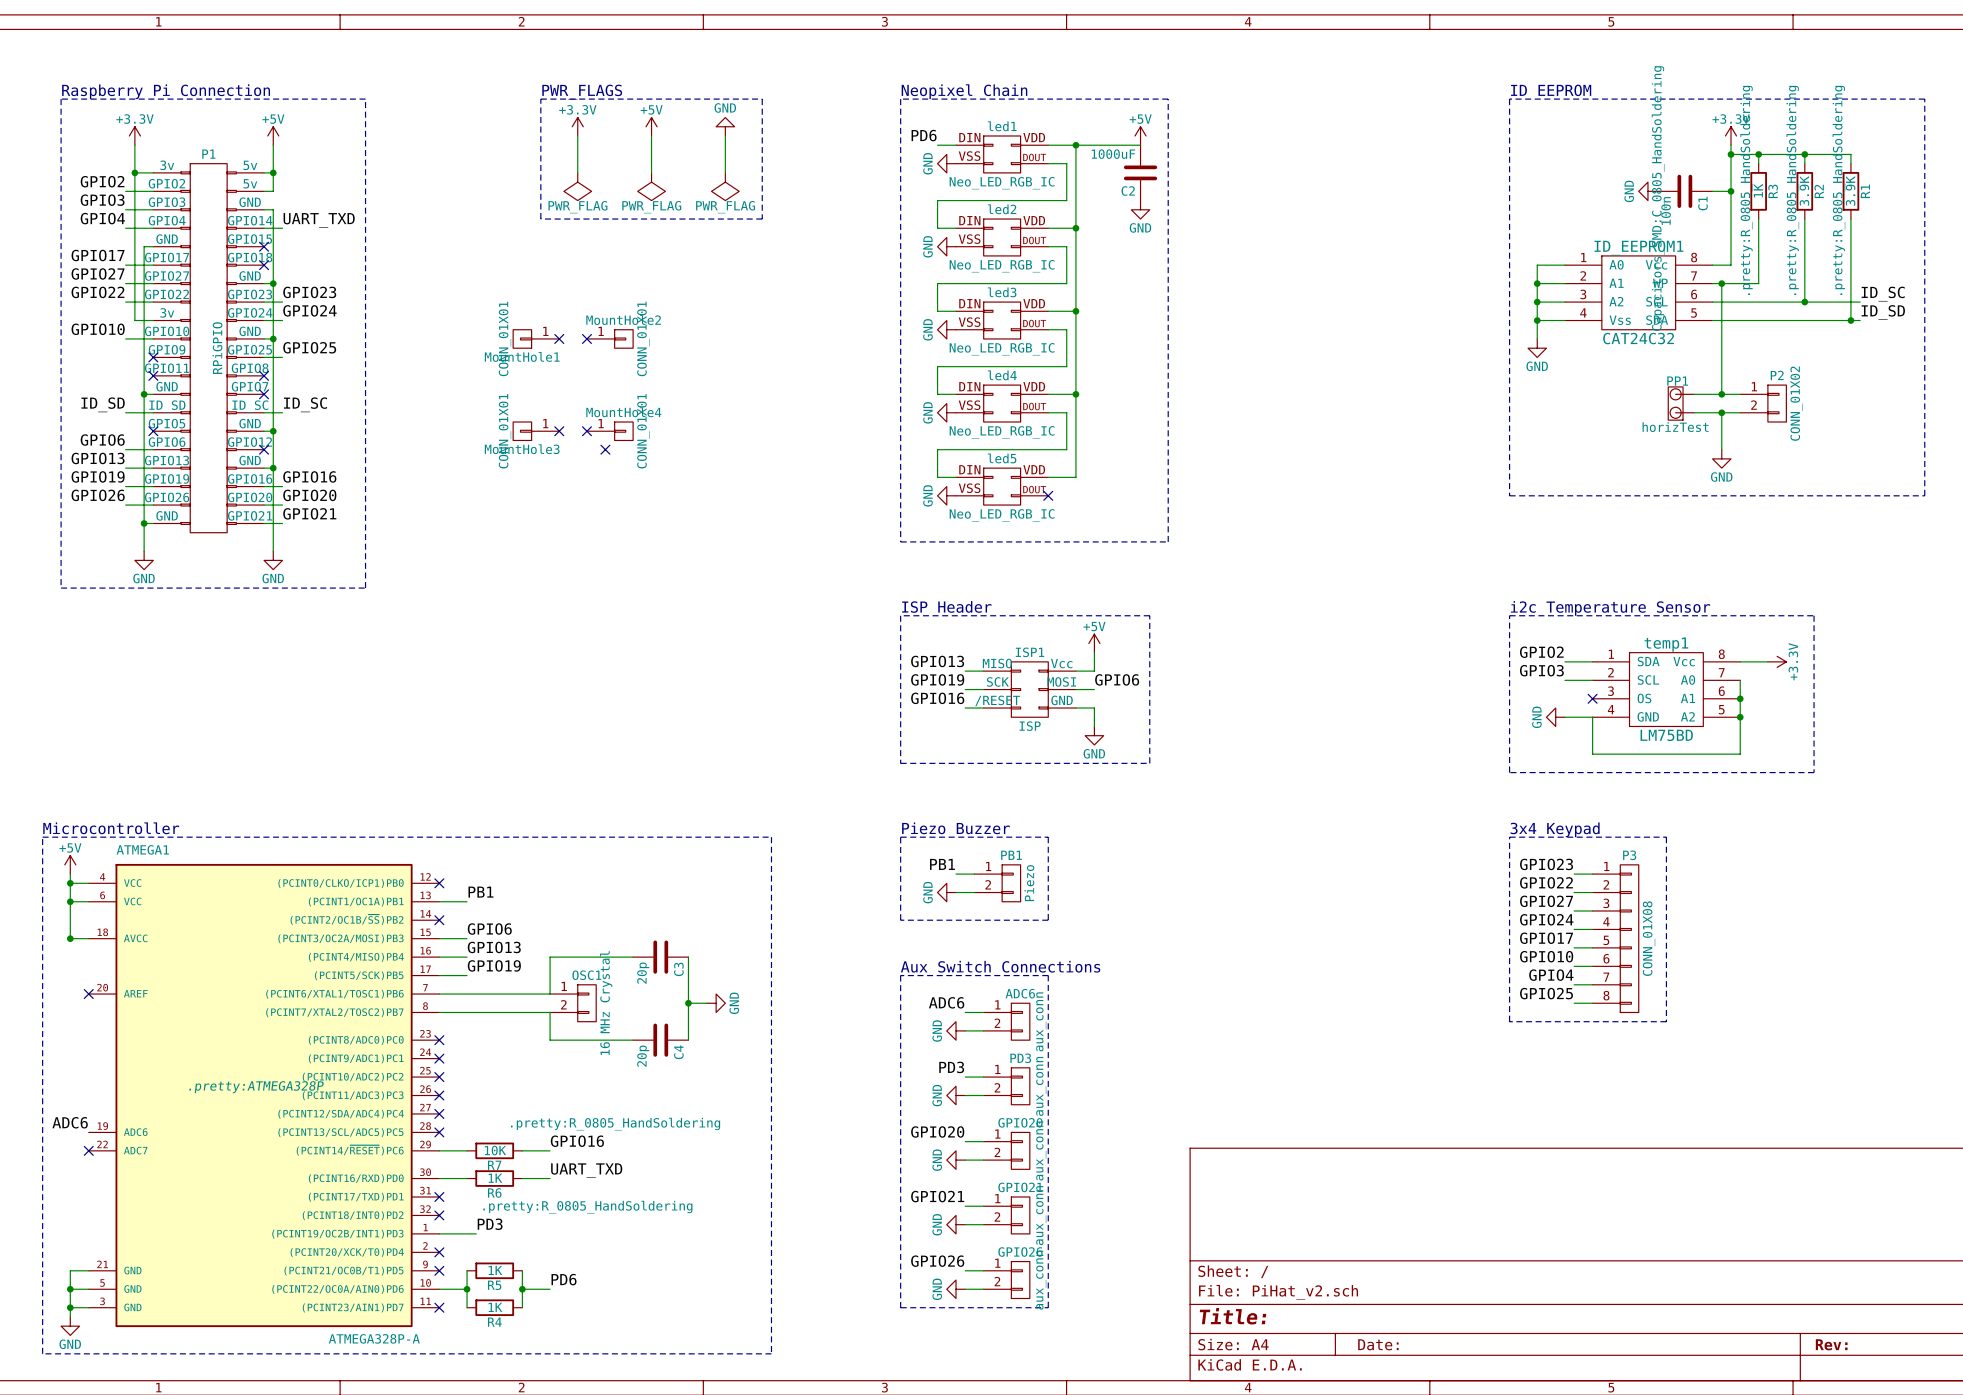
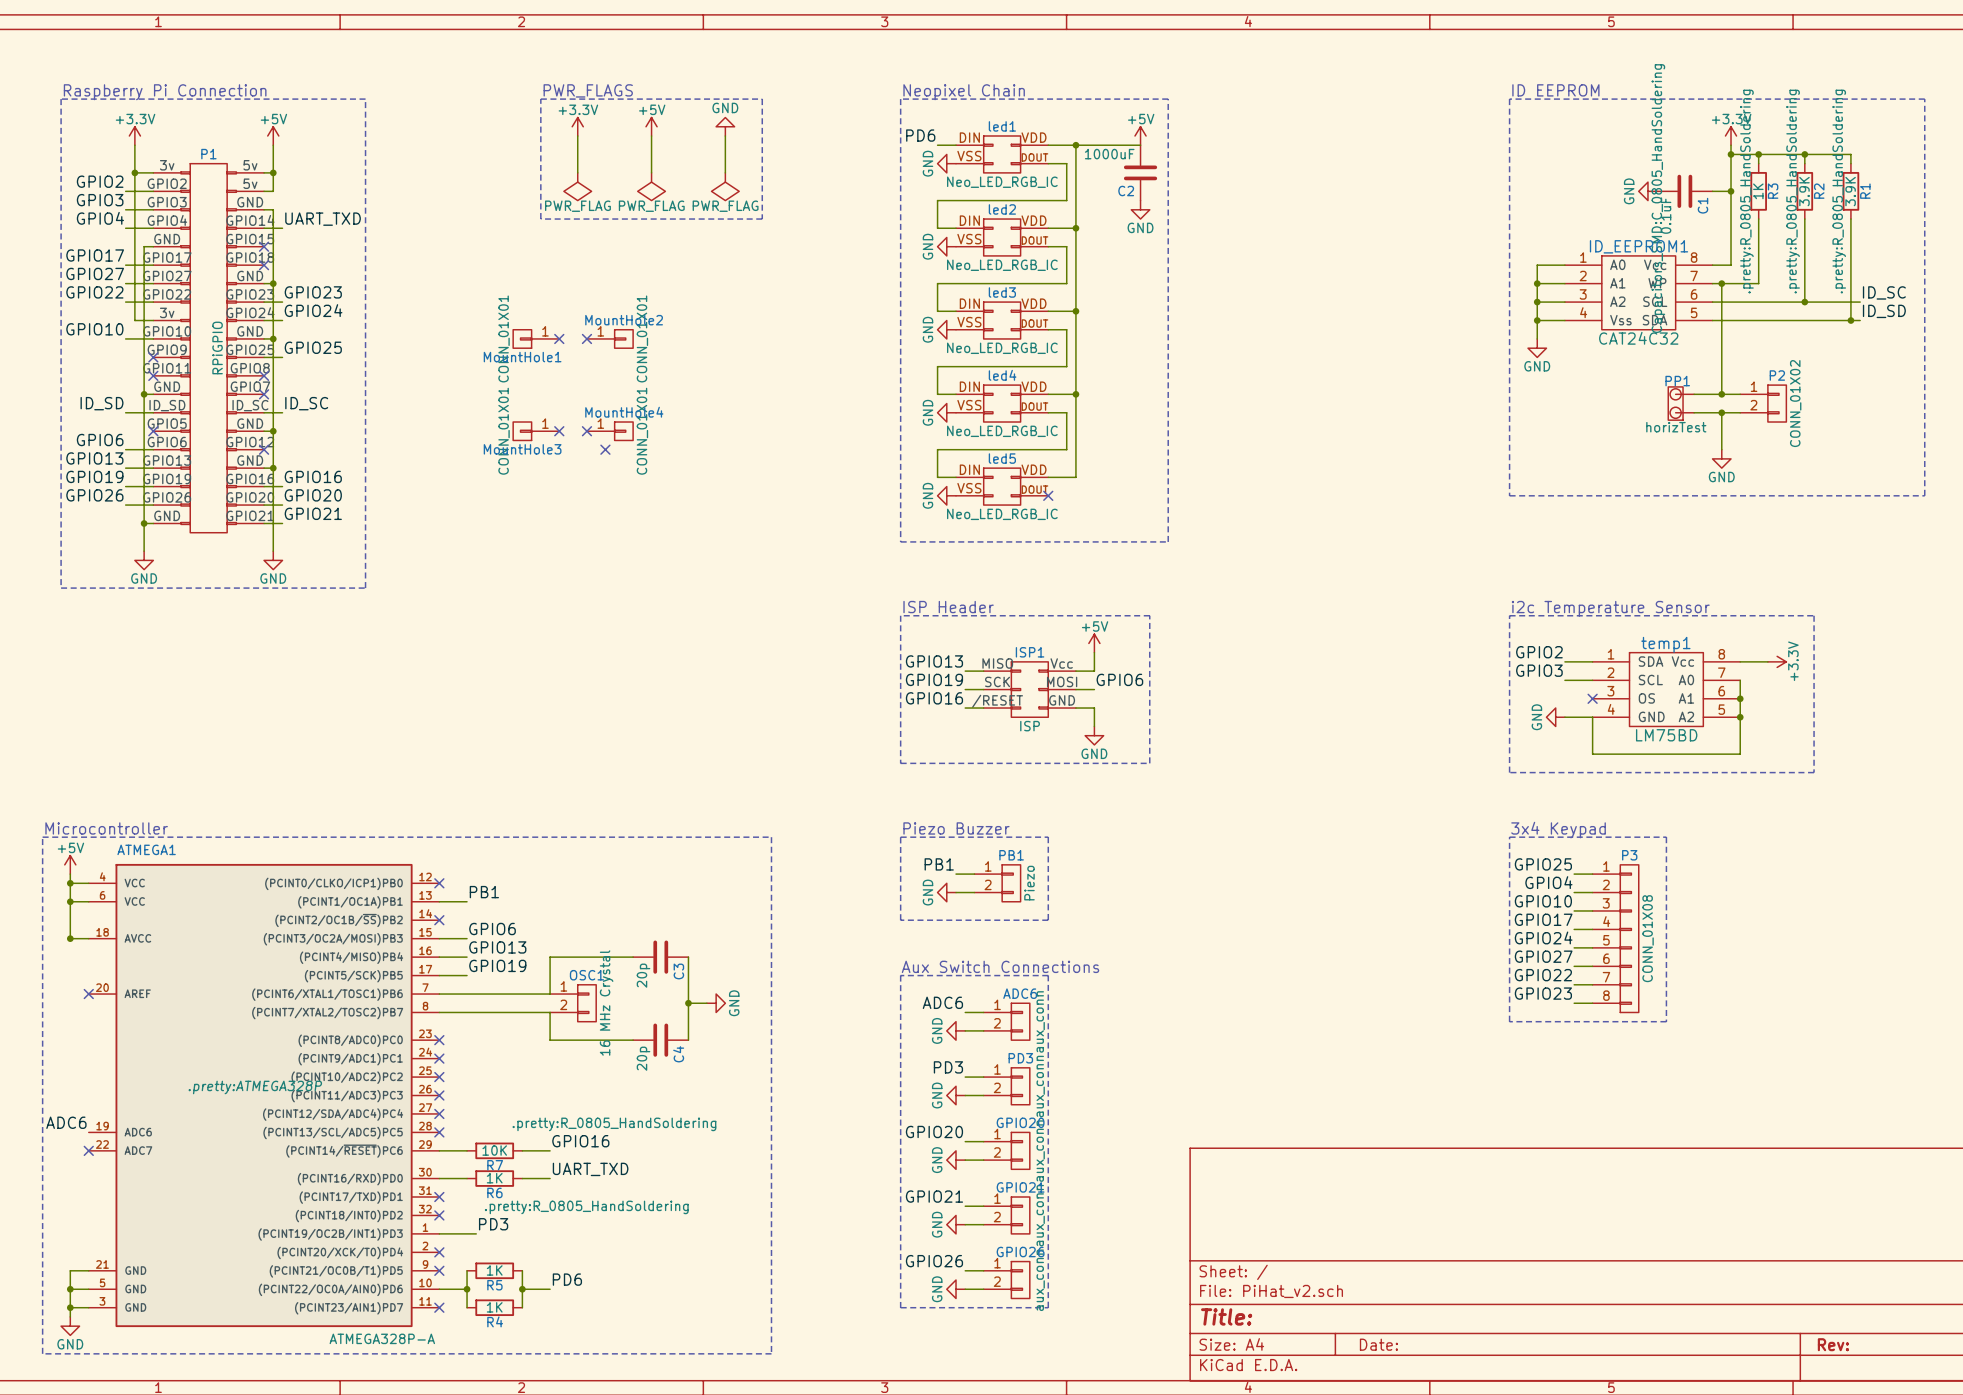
C1 value: 100n (1666, 211) -> 0.1uF (1666, 215)
label: GPIO23 (1546, 864) -> GPIO25 (1543, 864)
label: GPIO22 (1546, 882) -> GPIO4 (1548, 882)
label: GPIO27 (1546, 901) -> GPIO10 (1543, 901)
label: GPIO24 (1546, 919) -> GPIO17 (1543, 919)
label: GPIO17 (1546, 938) -> GPIO24 (1543, 937)
label: GPIO10 (1546, 956) -> GPIO27 (1543, 956)
label: GPIO4 (1551, 975) -> GPIO22 (1543, 975)
label: GPIO25 (1546, 993) -> GPIO23 (1543, 993)

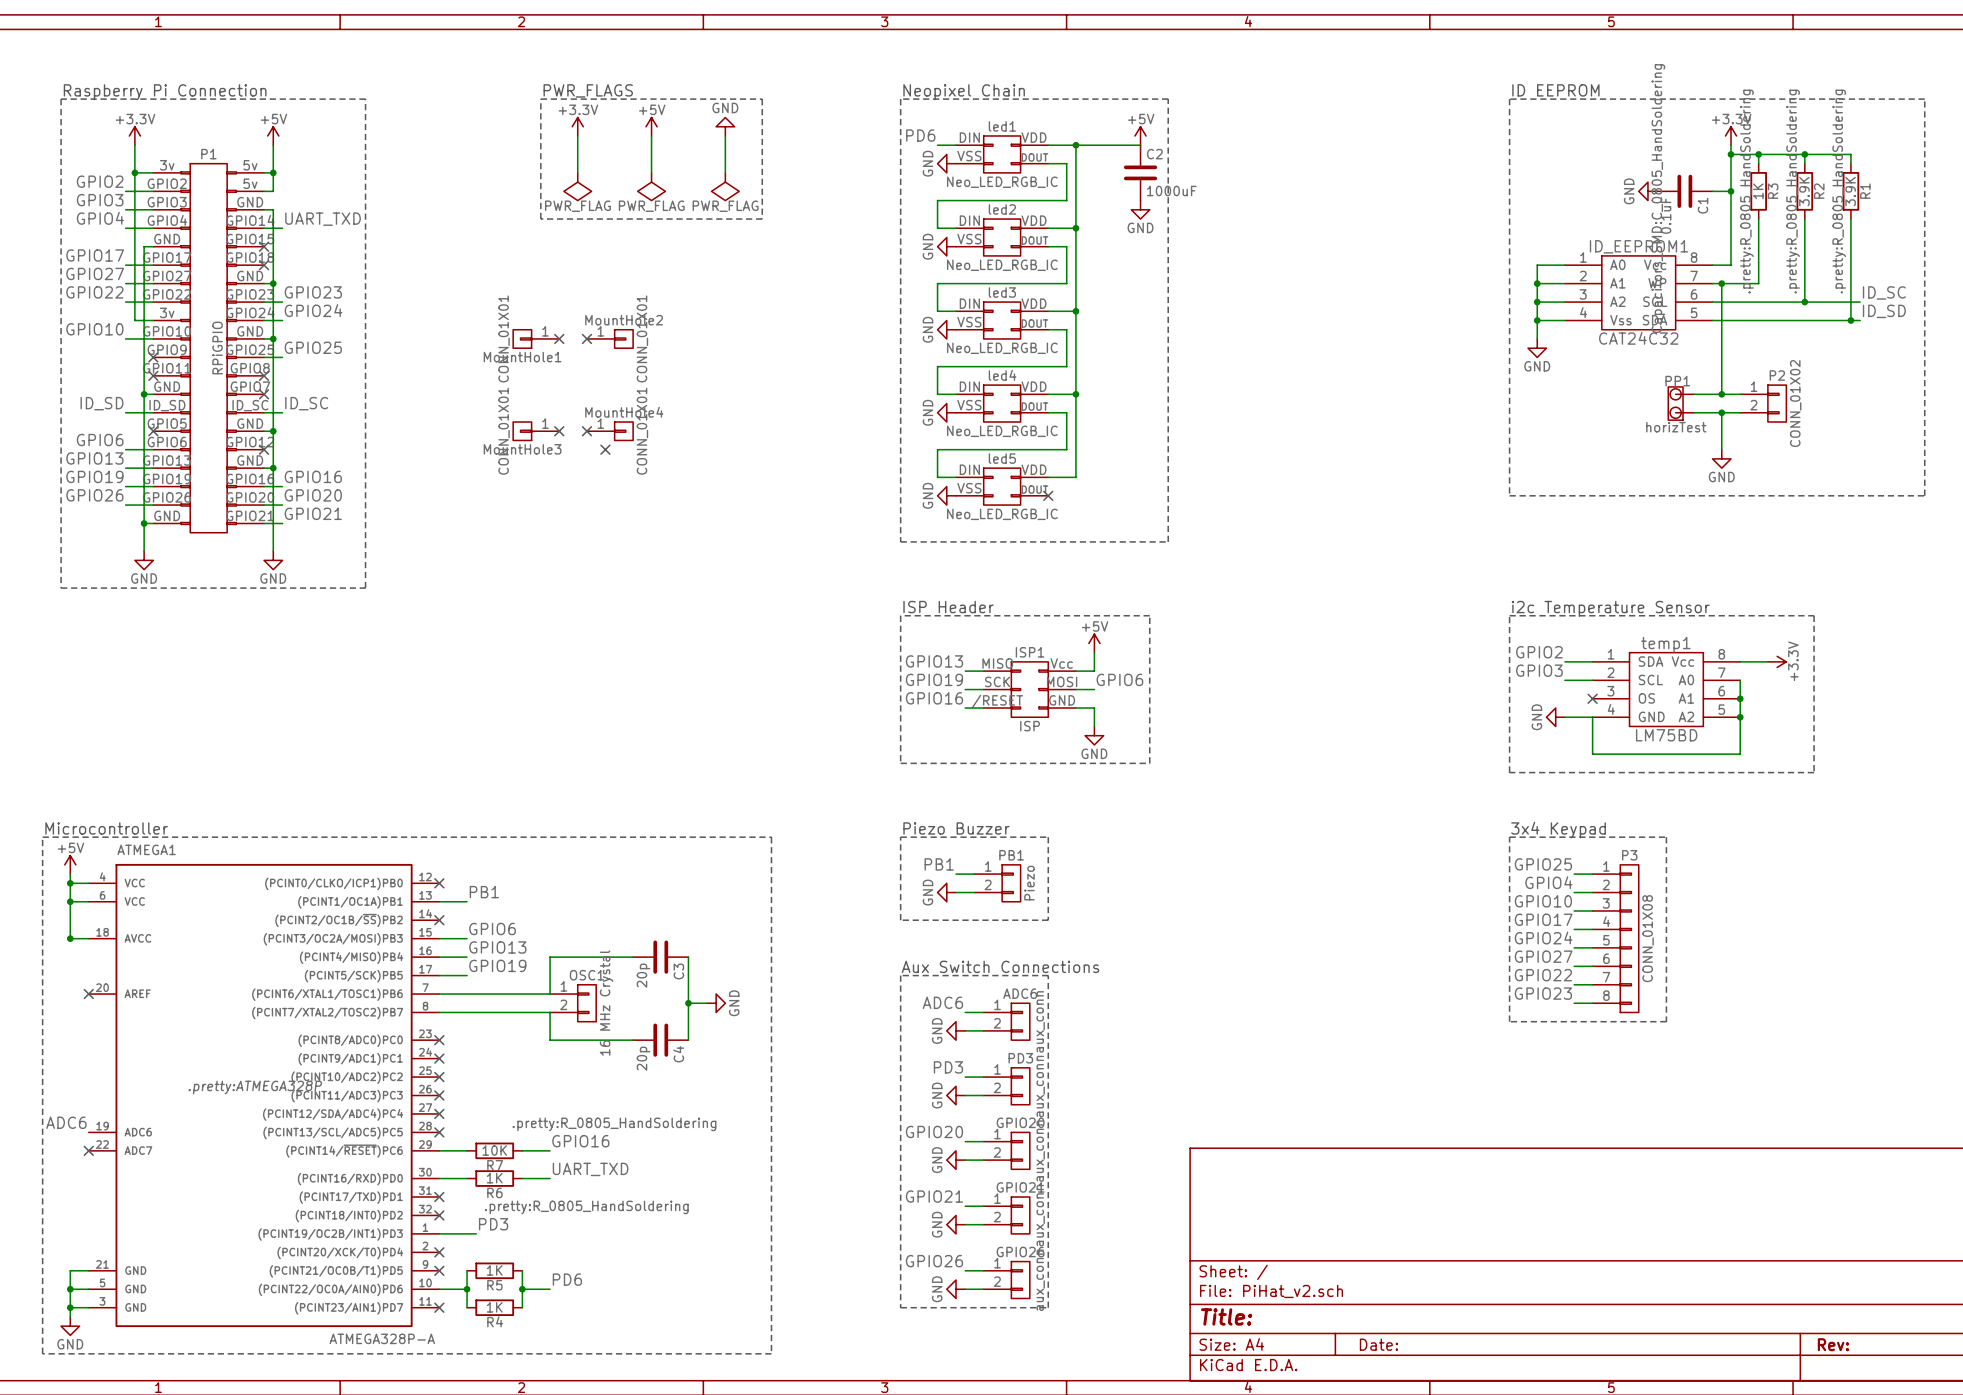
C2 value position: 1000uF (1109, 154) -> 1000uF (1171, 191)
C2 name position: C2 (1126, 191) -> C2 (1154, 154)

